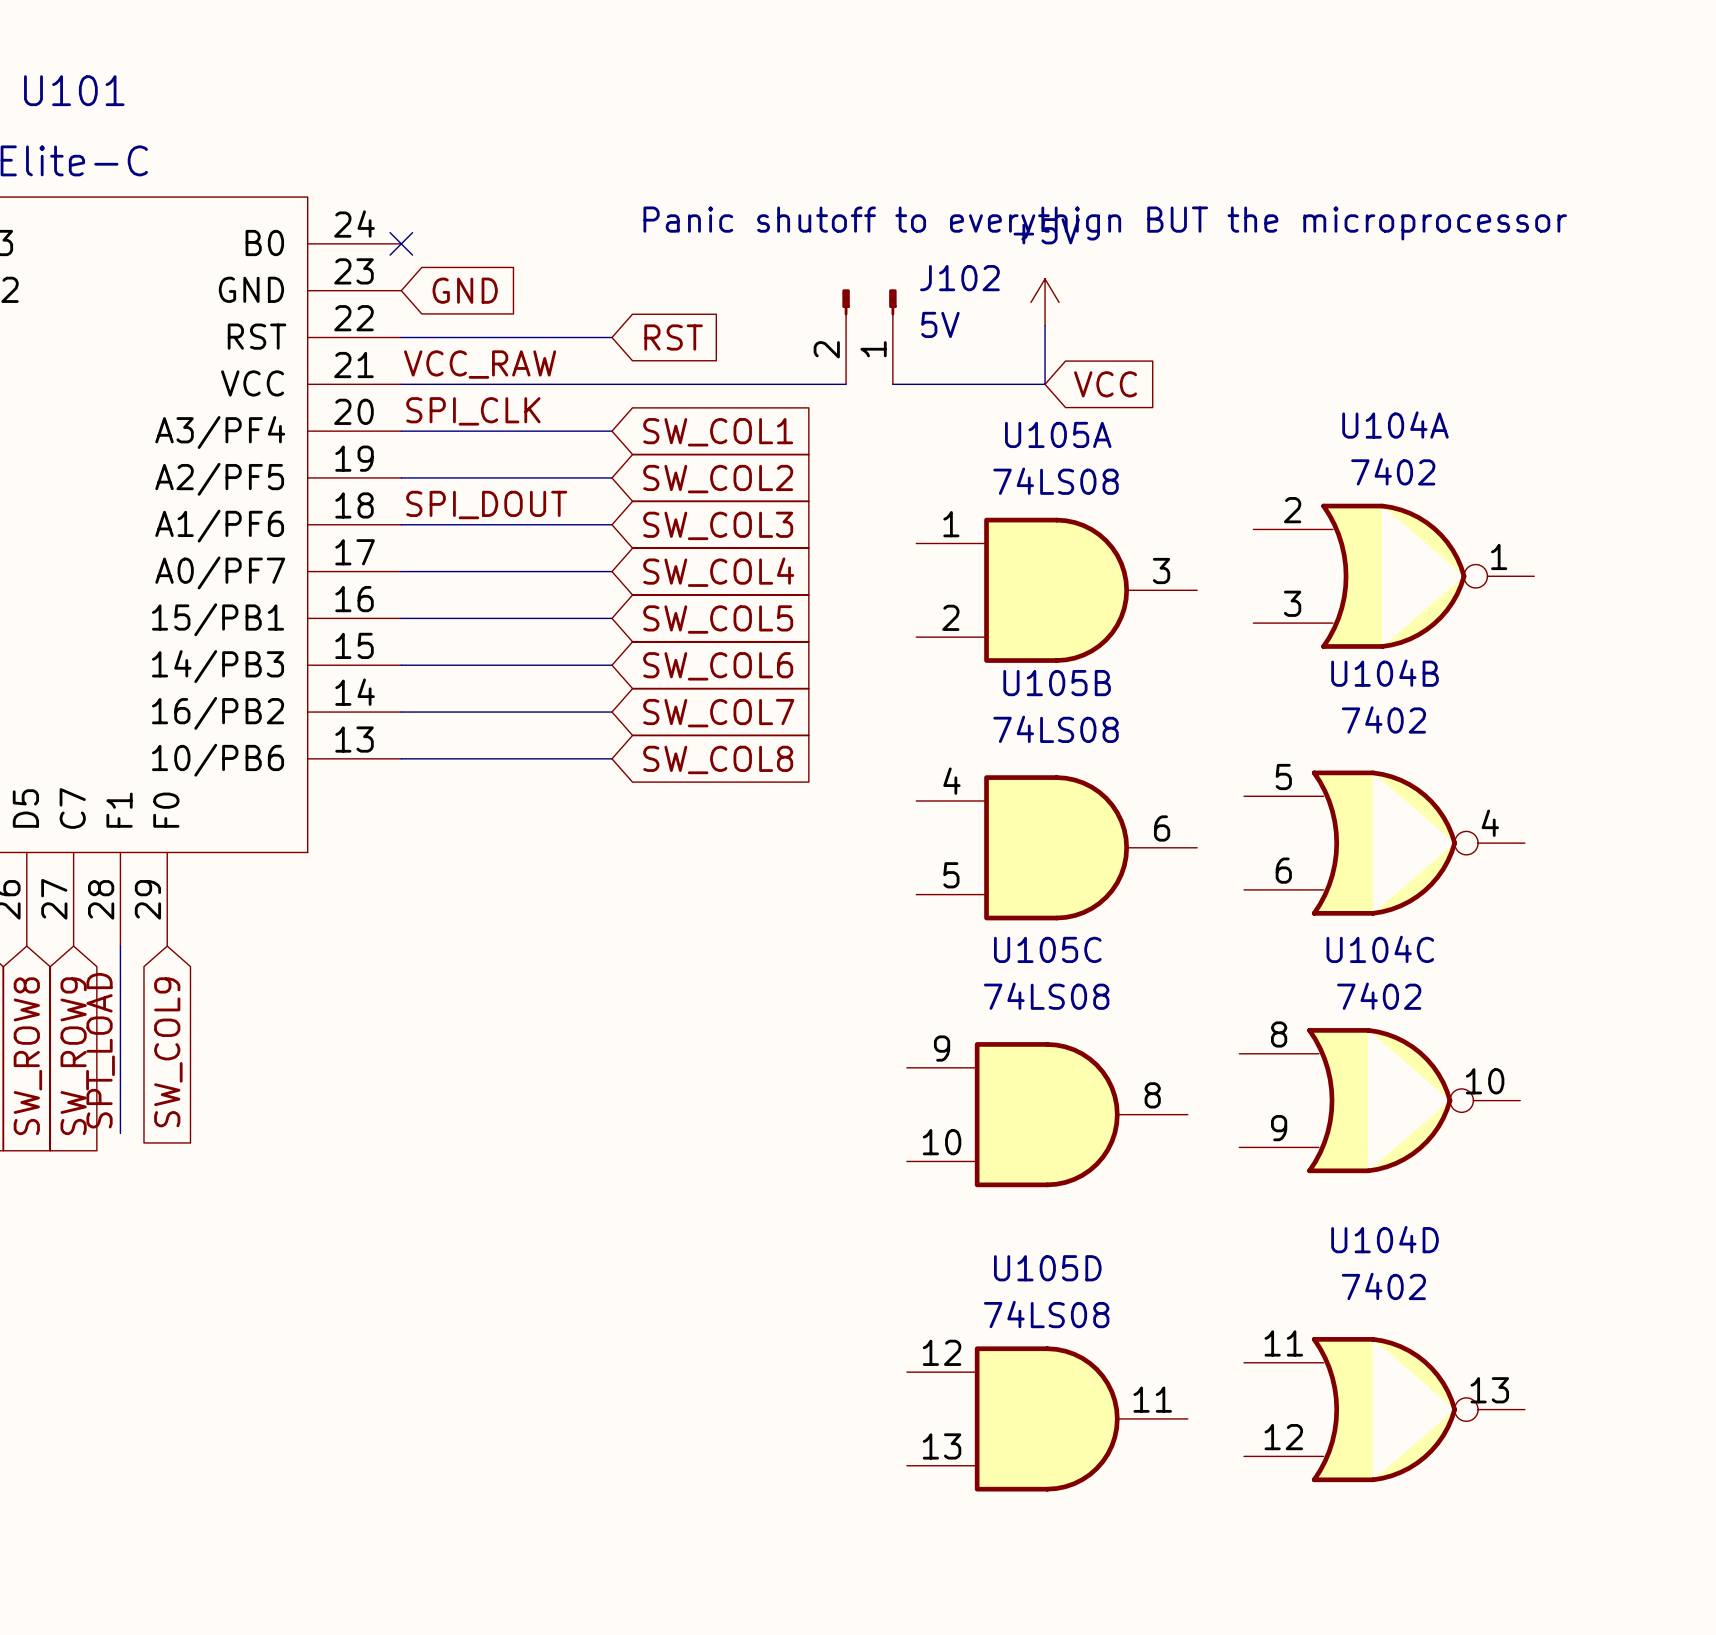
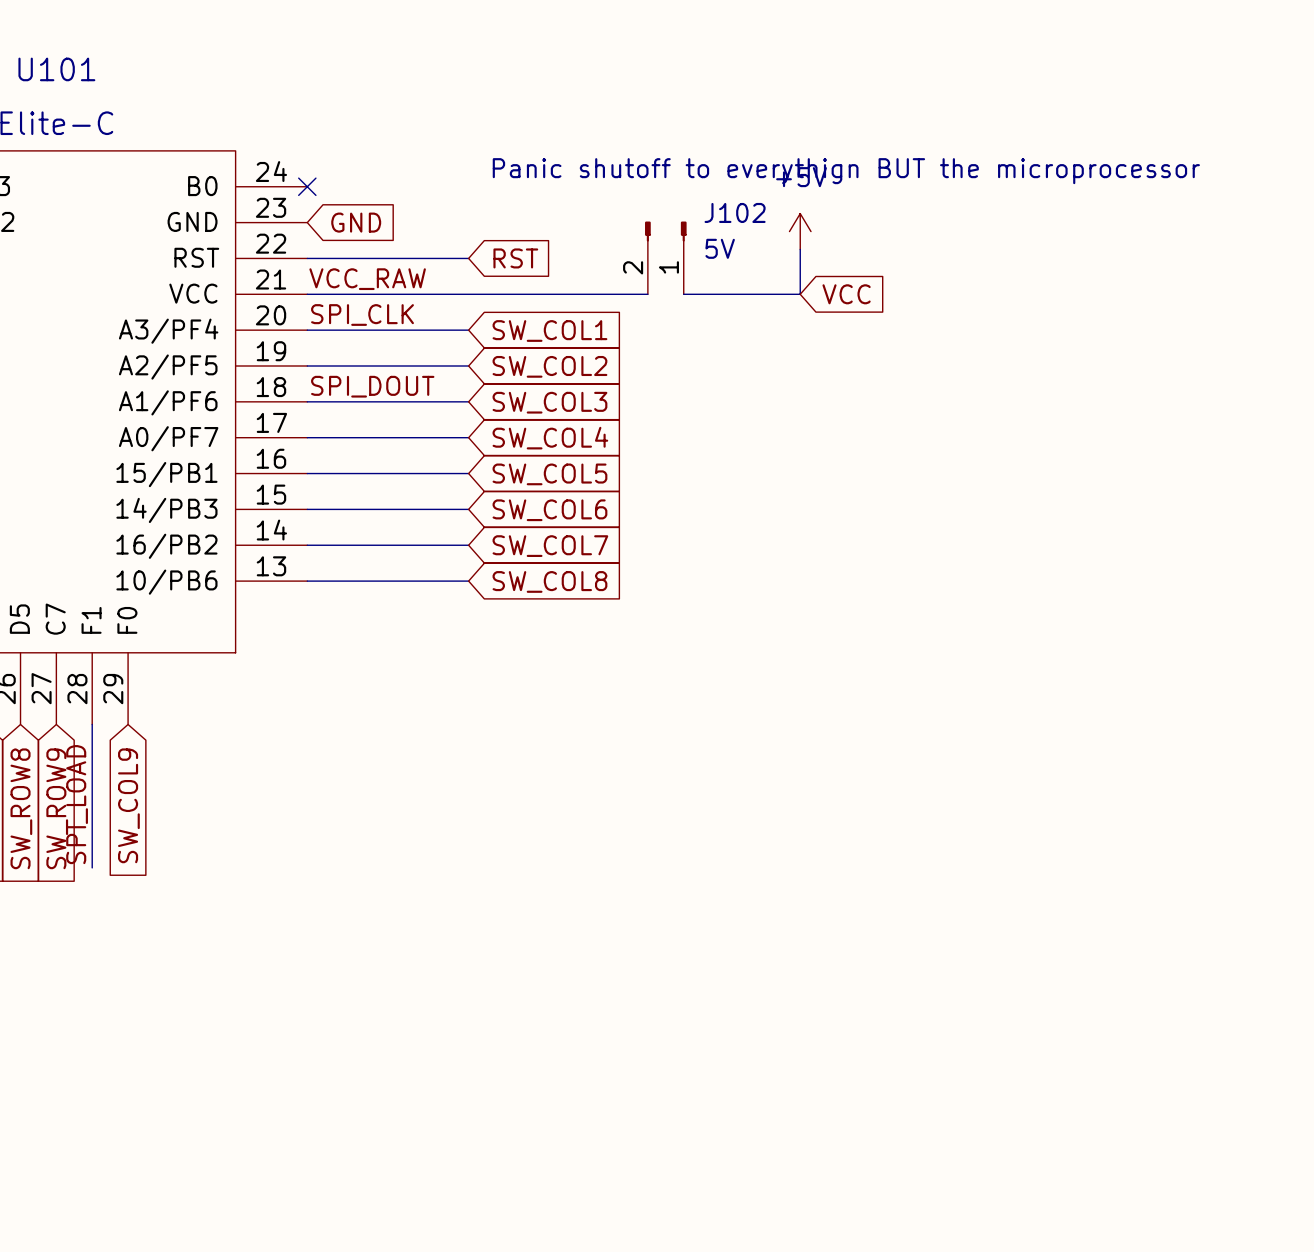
U104A: 7402 (1393, 576) -> none
U105A: 74LS08 (1056, 590) -> none
U104B: 7402 (1384, 843) -> none
U105B: 74LS08 (1056, 847) -> none
U104C: 7402 (1379, 1100) -> none
U105C: 74LS08 (1047, 1114) -> none
U104D: 7402 (1384, 1409) -> none
U105D: 74LS08 (1047, 1418) -> none

